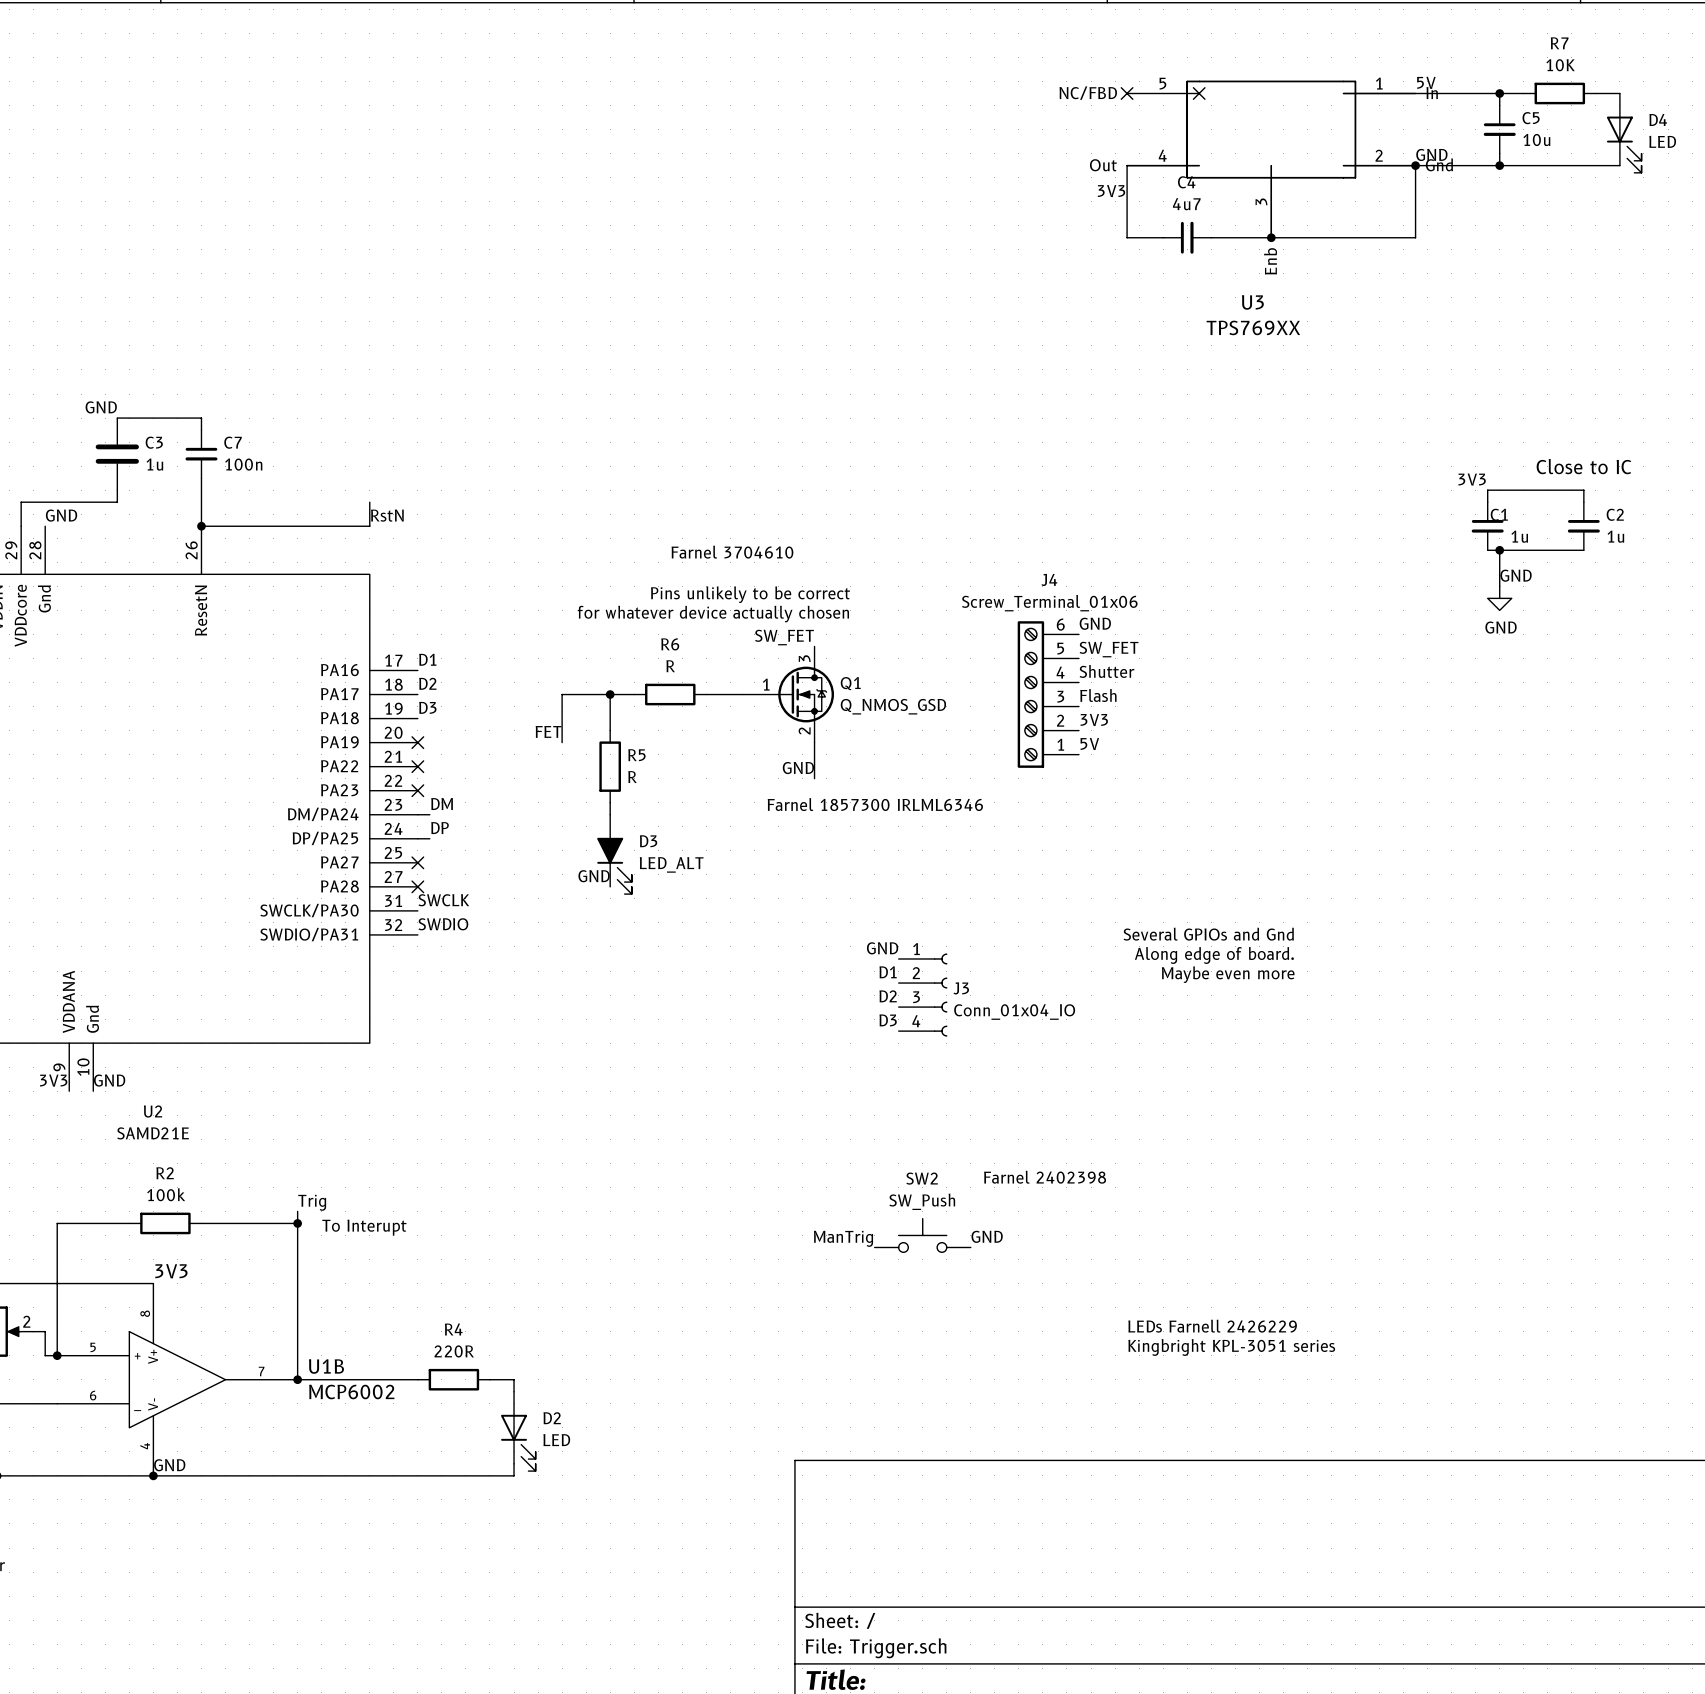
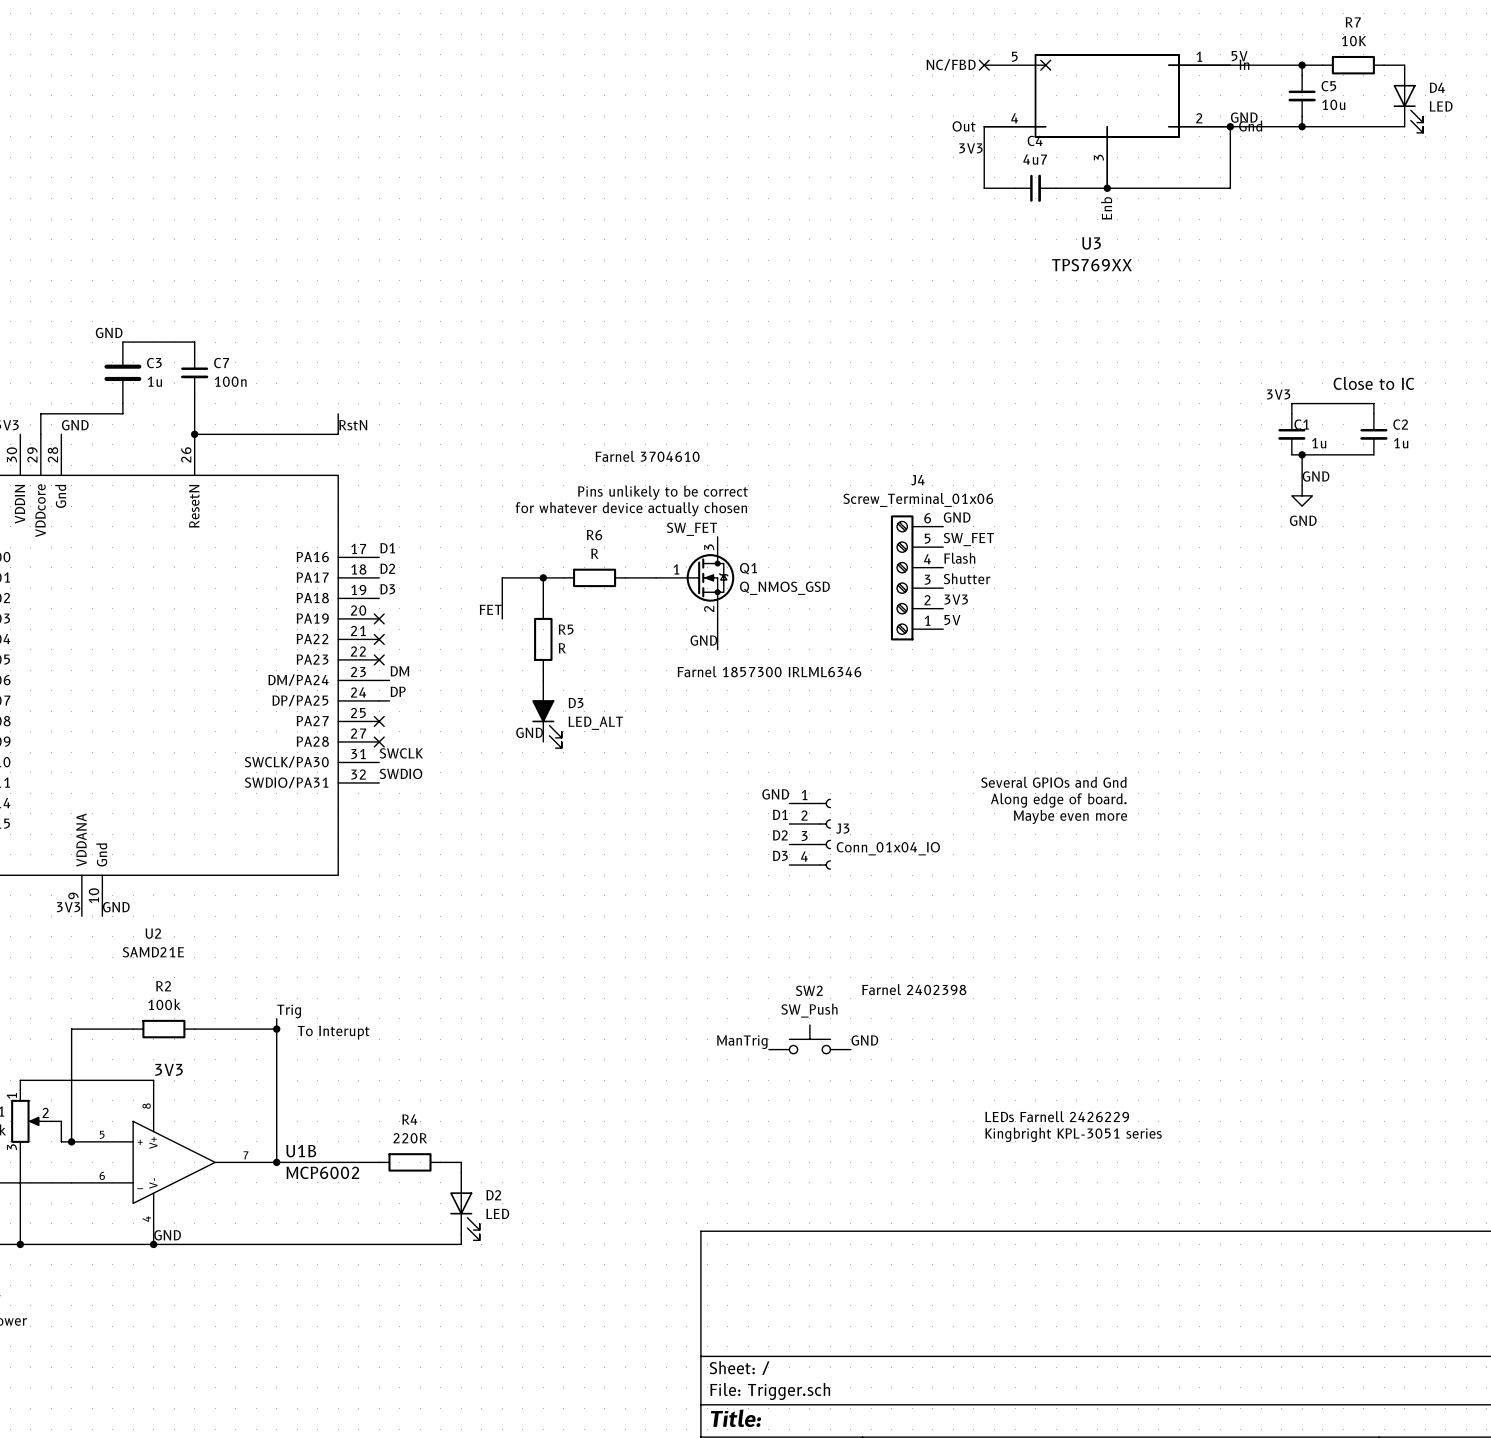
label: Shutter (1106, 671) -> Flash (959, 558)
label: Flash (1098, 695) -> Shutter (967, 578)

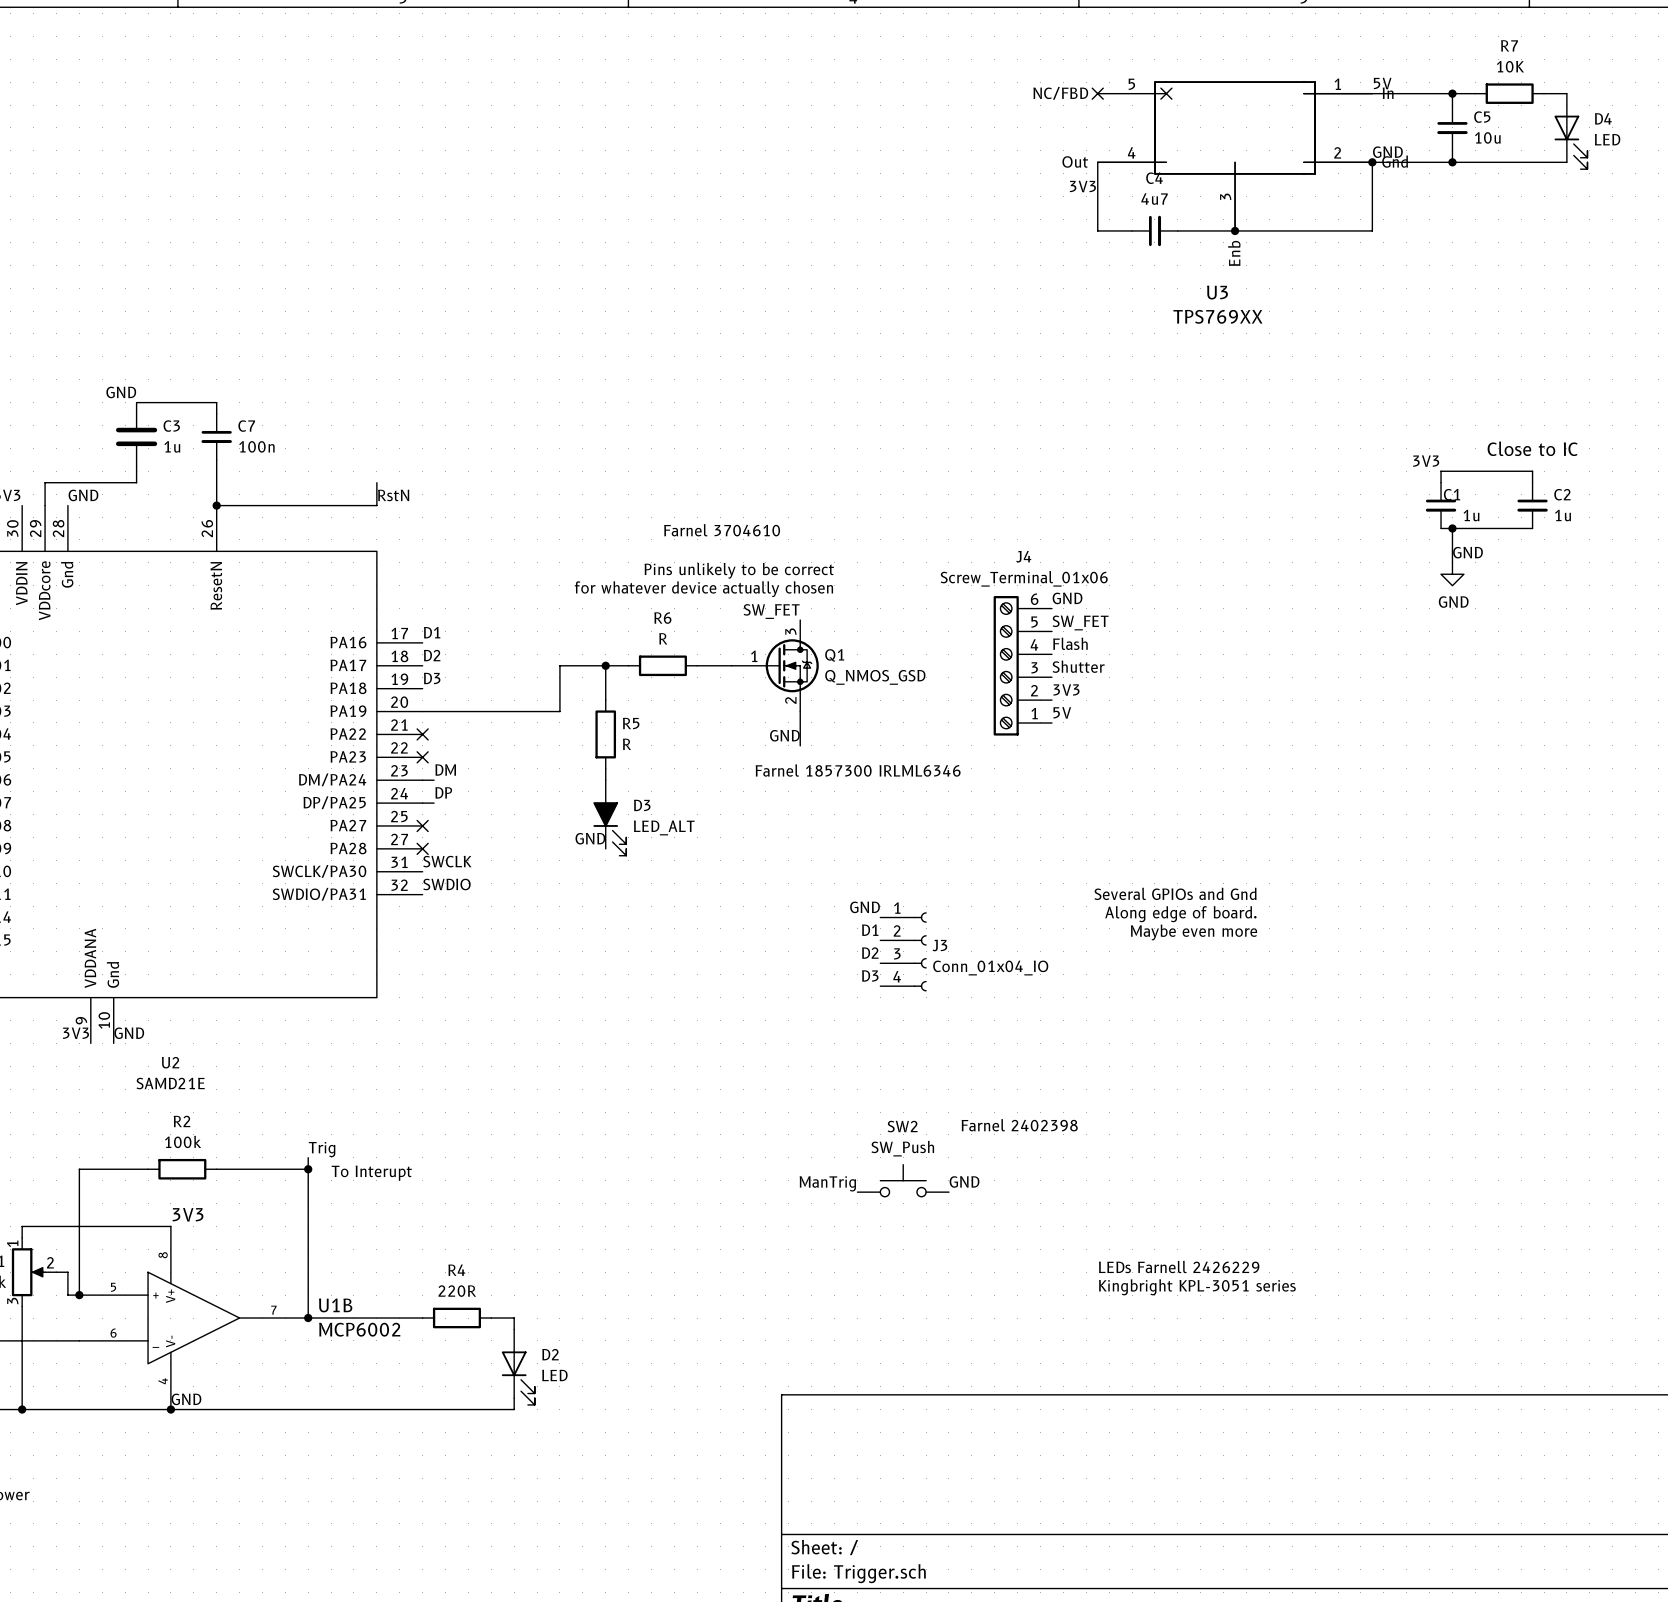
label: FET (490, 609) -> none
wire: none -> (422, 711) (559, 711)
no-connect mark: (379, 618) -> none

